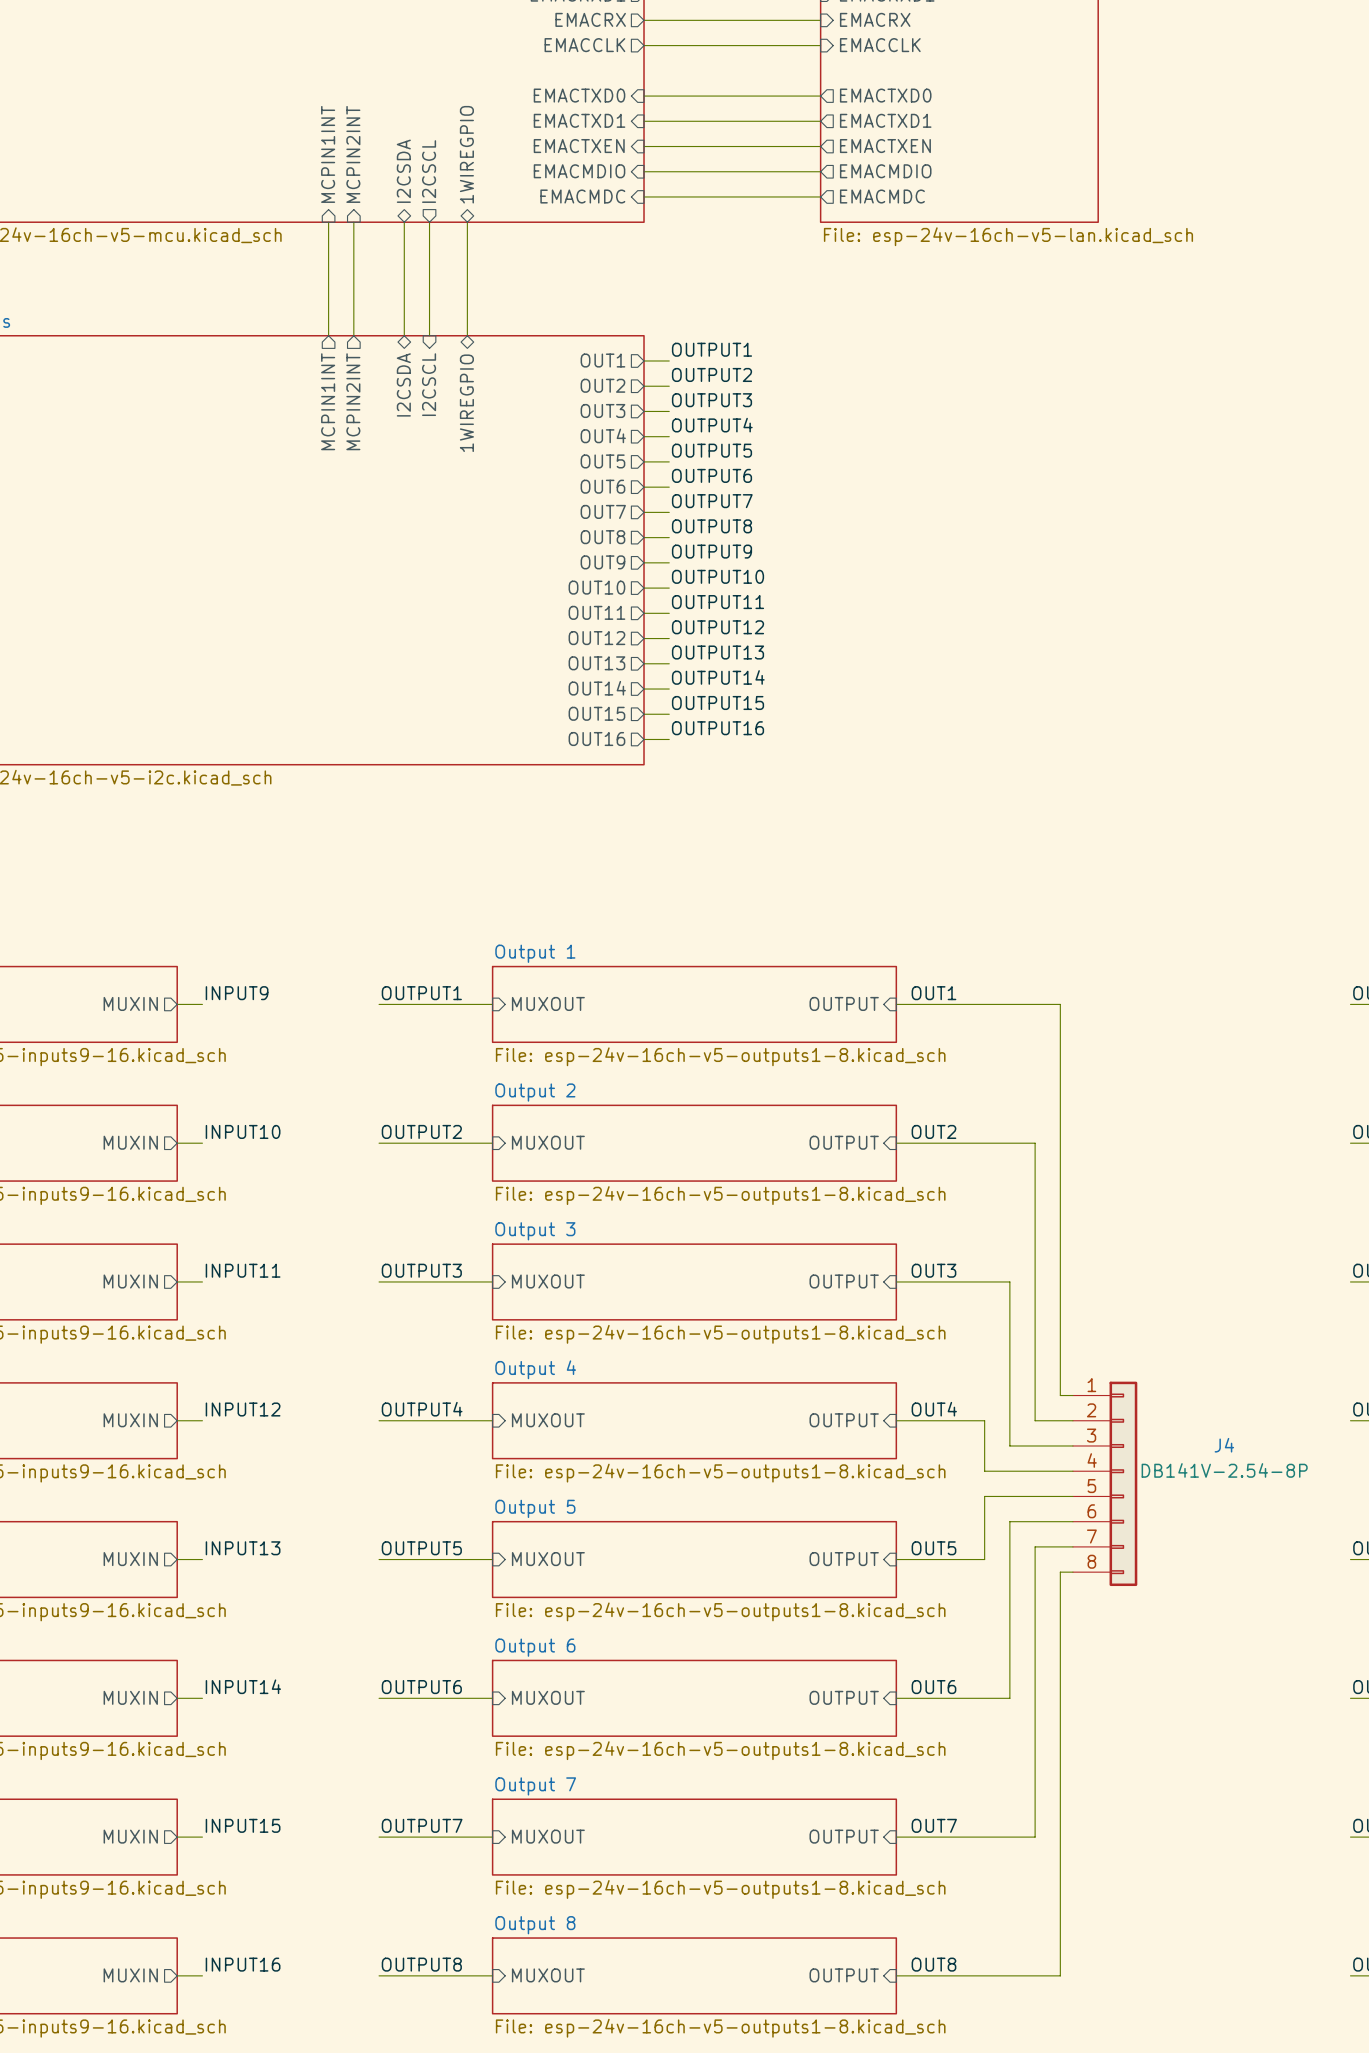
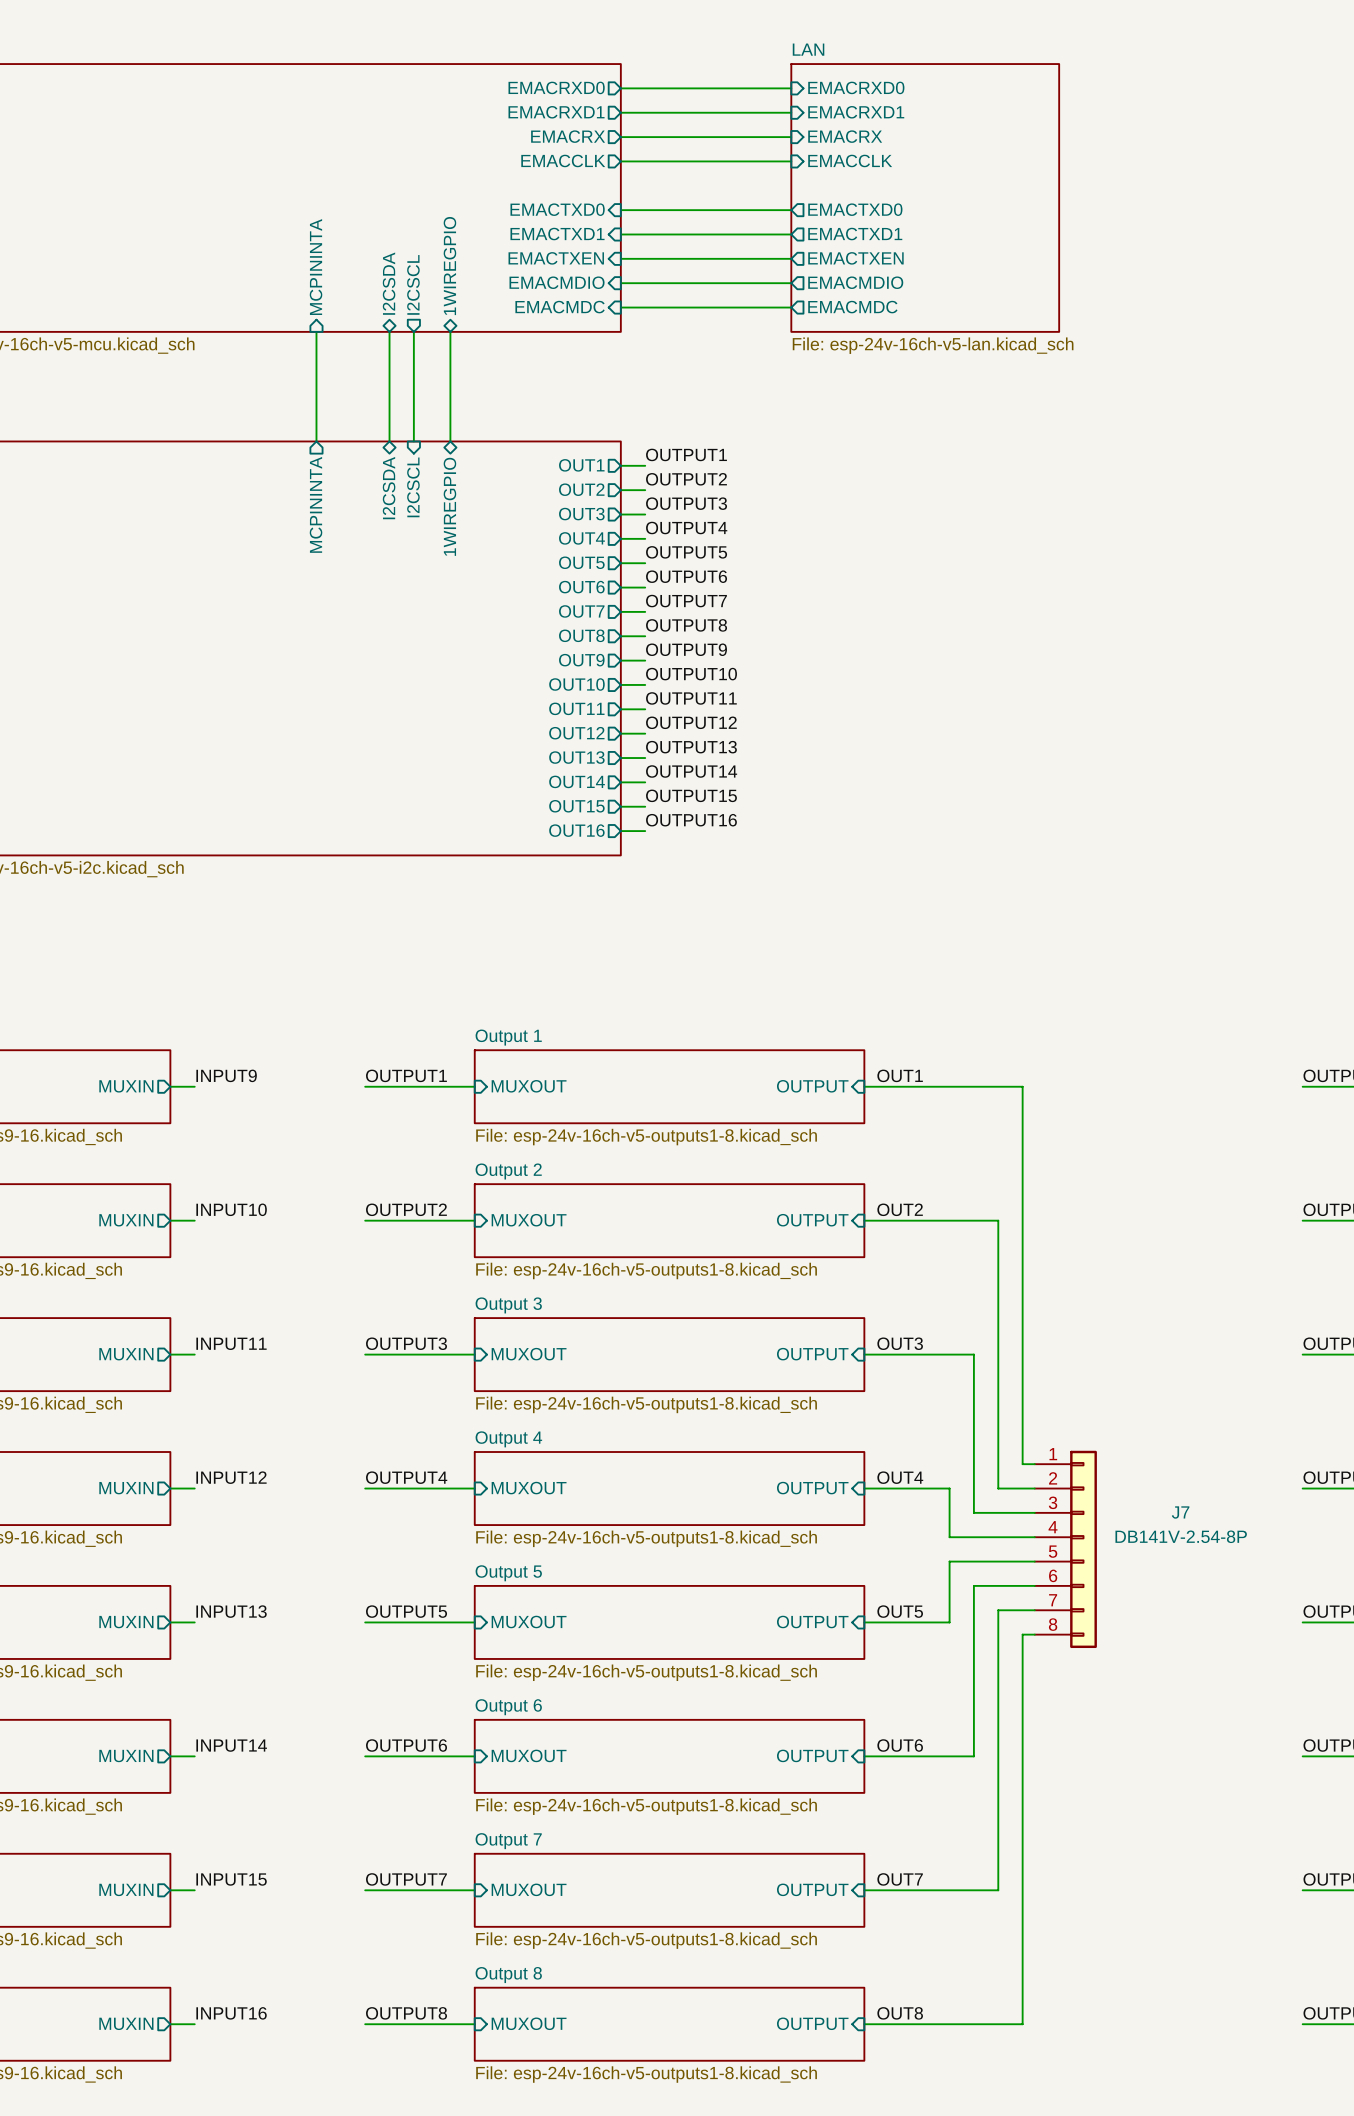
sheet pin: MCPIN1INT (328, 154) -> MCPININTA (316, 267)
sheet pin: MCPIN2INT (353, 154) -> none
wire: (353, 222) (353, 335) -> none
sheet pin: MCPIN1INT (328, 401) -> MCPININTA (316, 504)
sheet pin: MCPIN2INT (353, 401) -> none
J4 name: J4 (1224, 1445) -> J7 (1180, 1512)

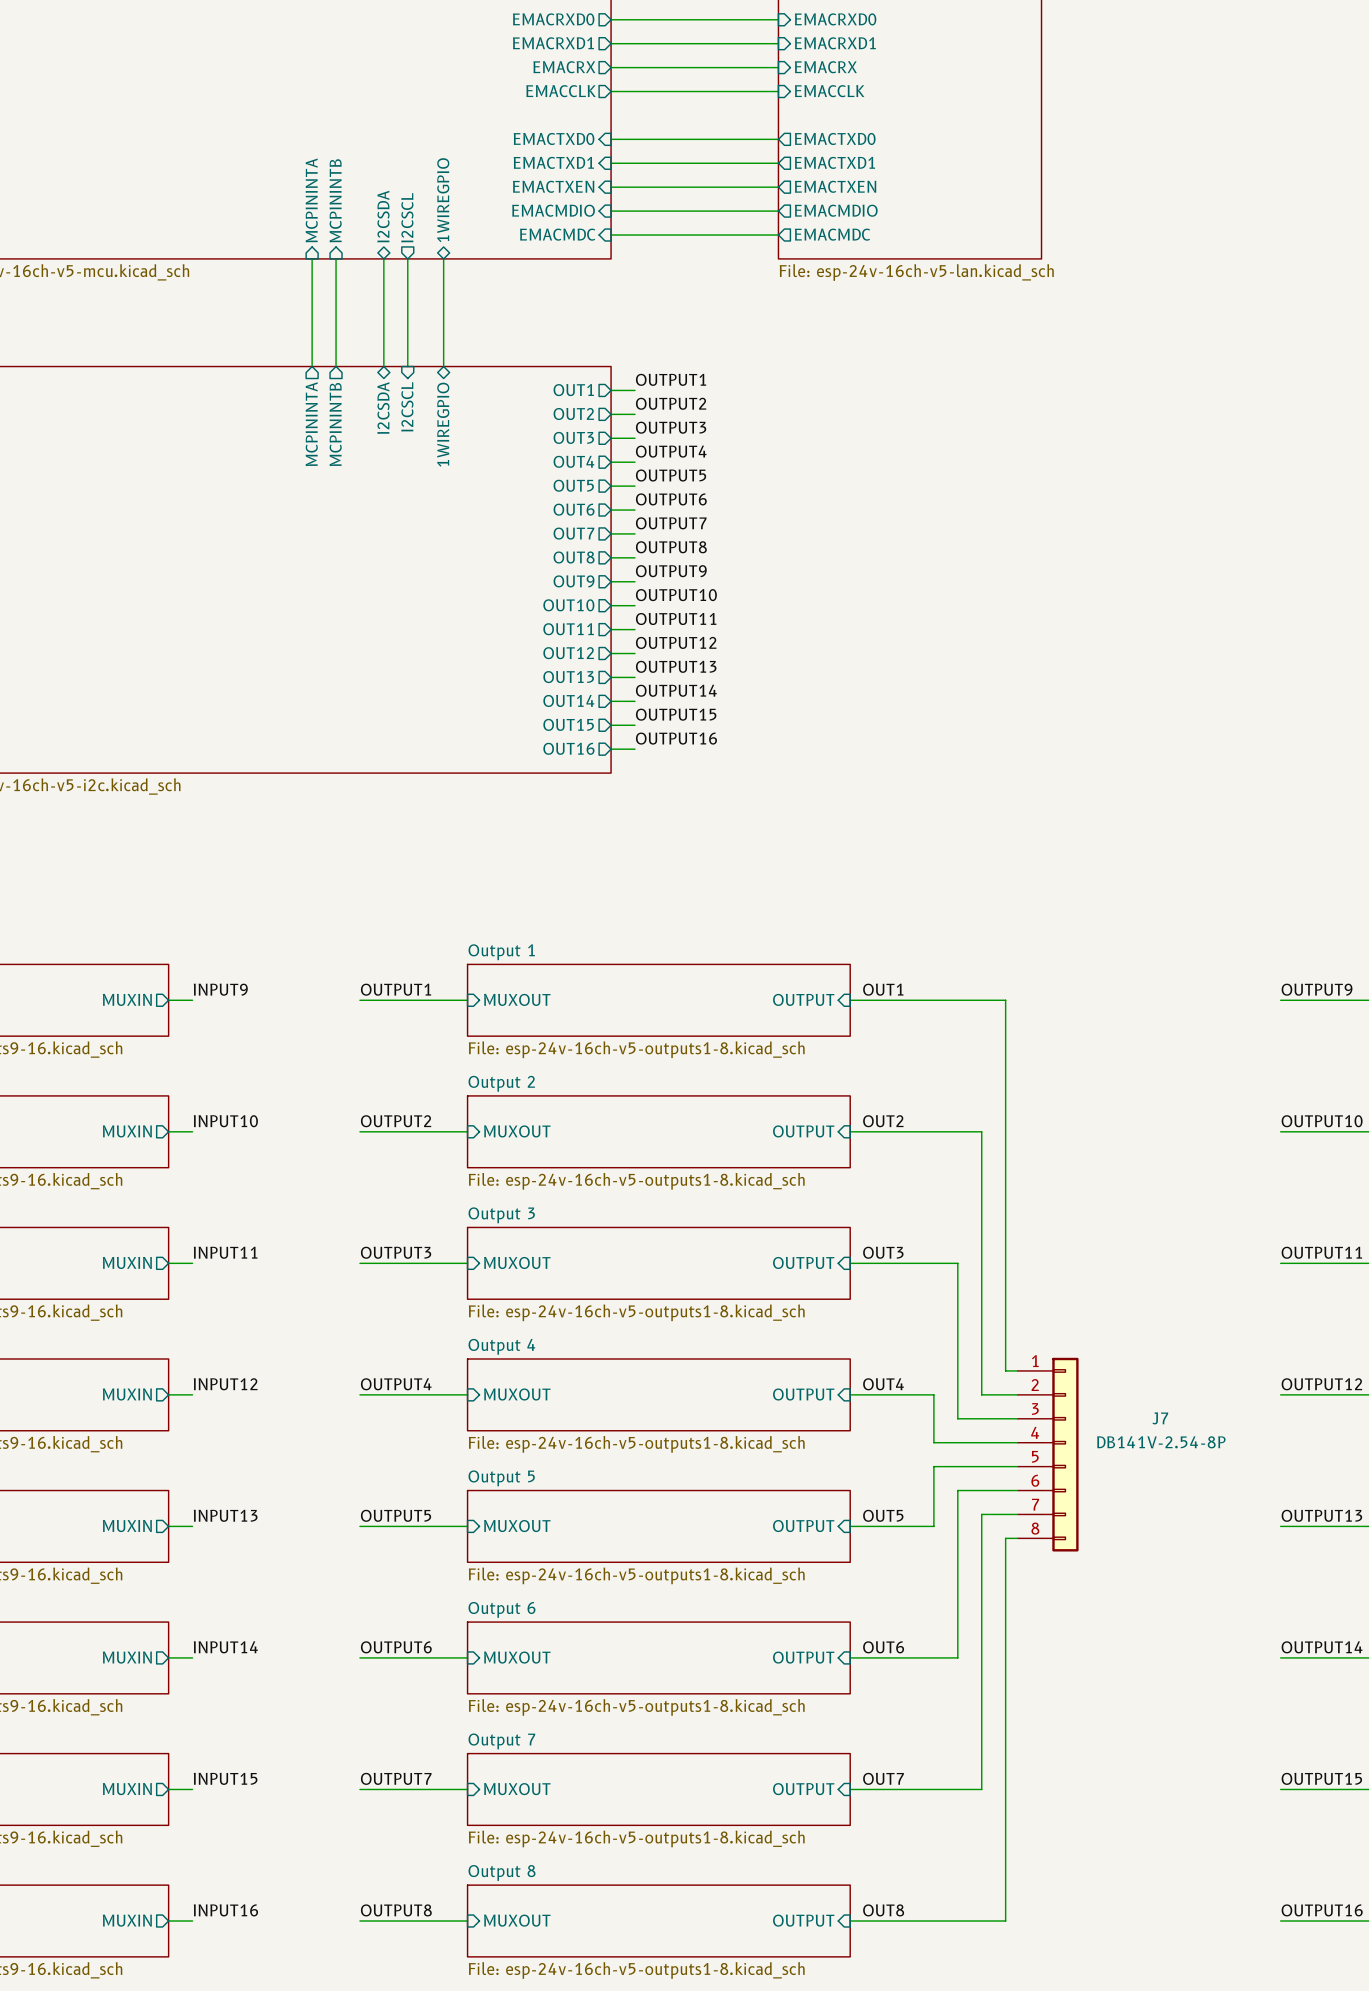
sheet pin: none -> MCPININTB (335, 200)
wire: none -> (336, 258) (336, 366)
sheet pin: none -> MCPININTB (335, 424)

